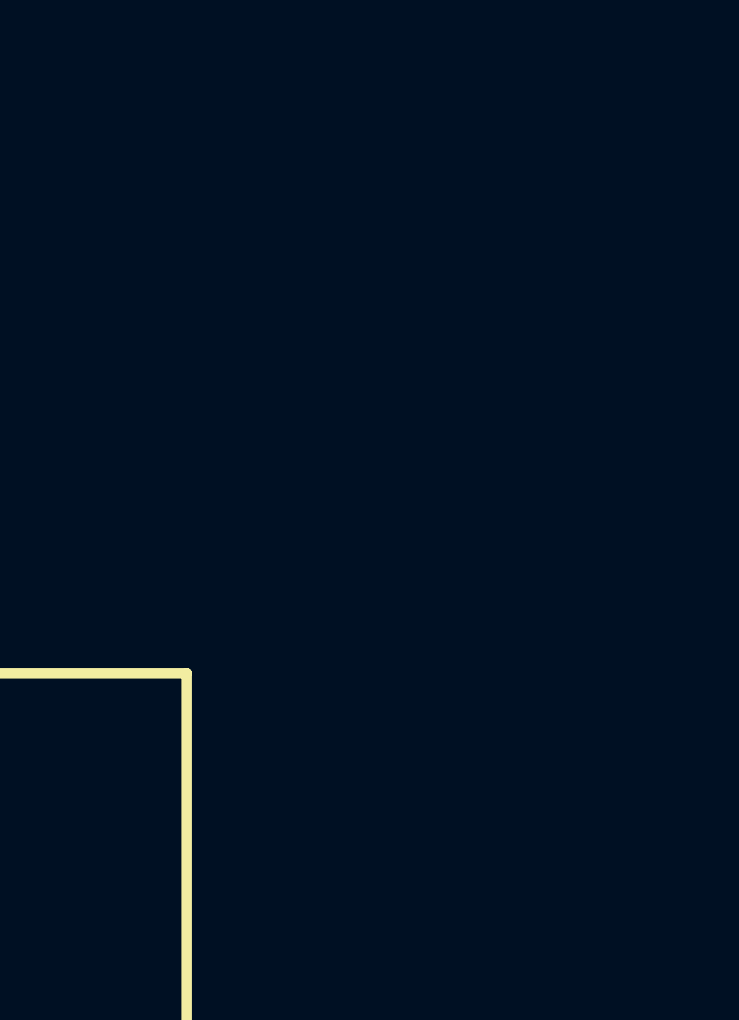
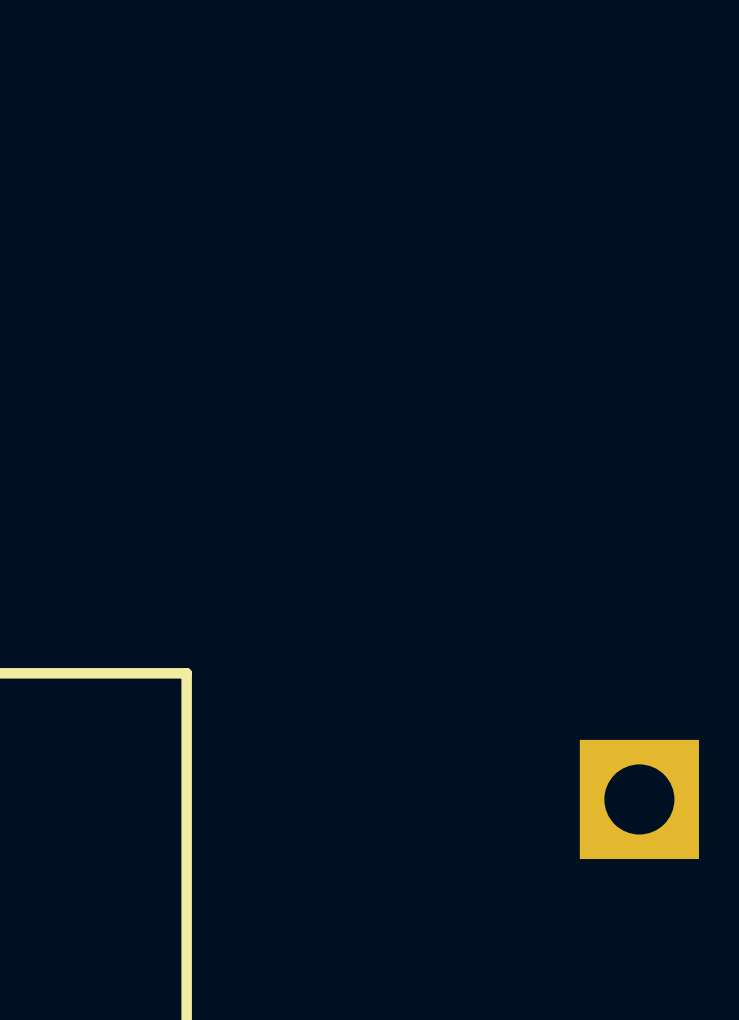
part: none -> (639, 799)

